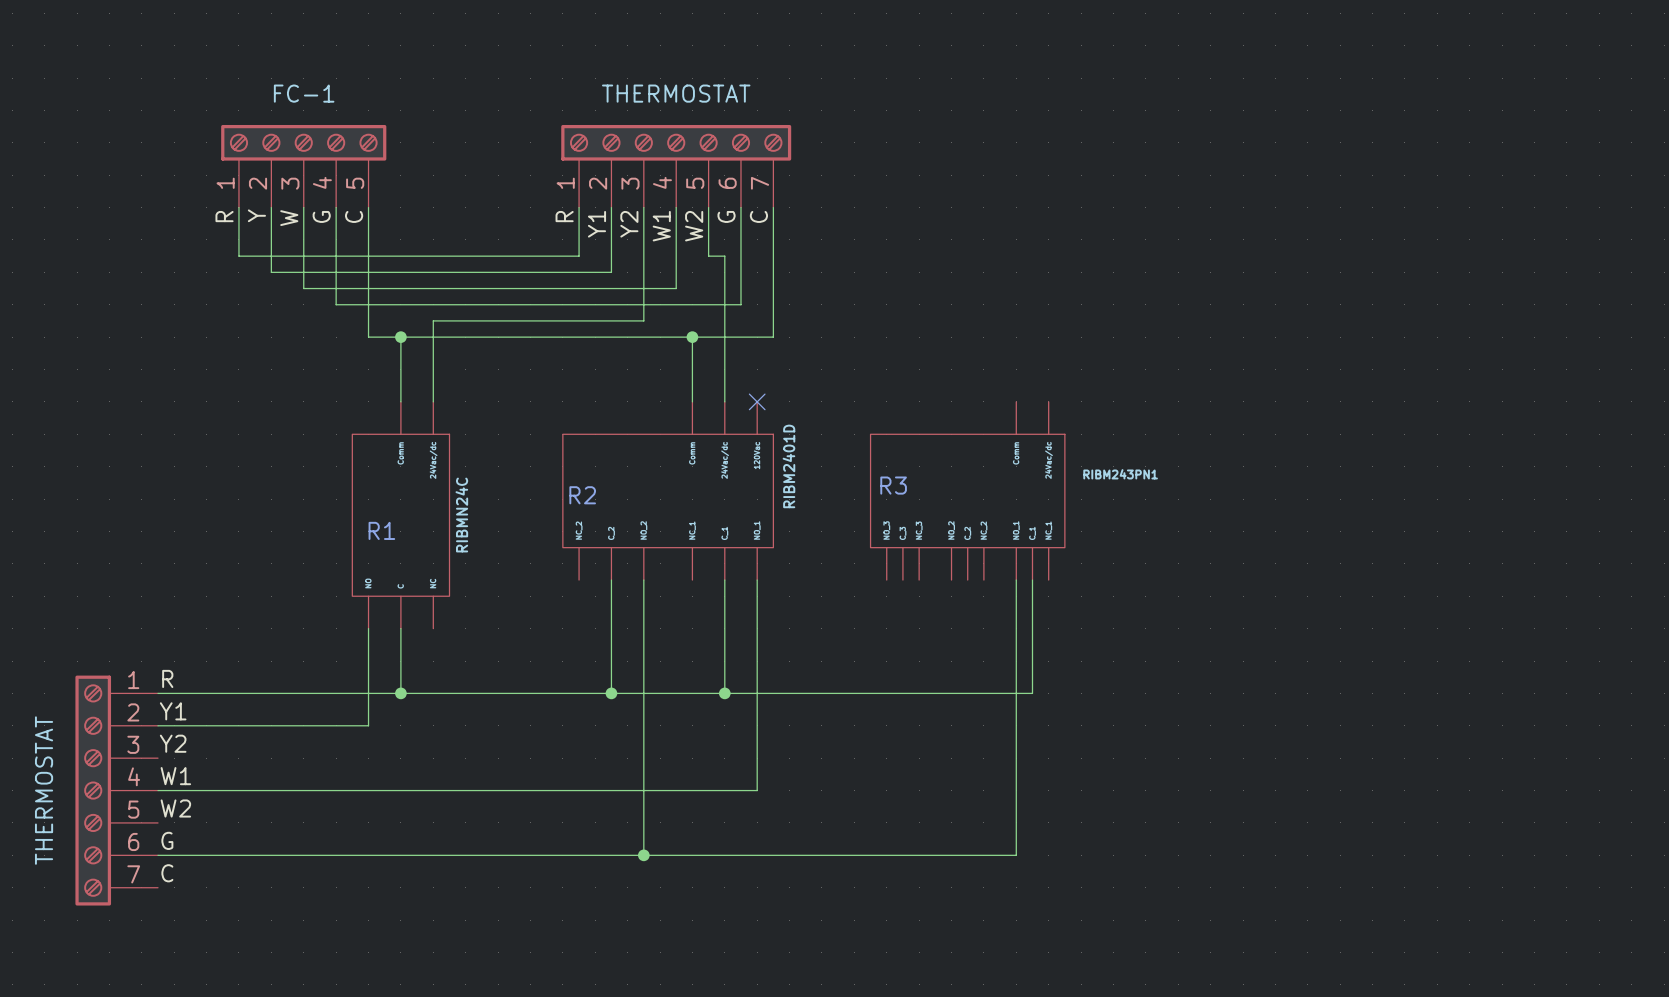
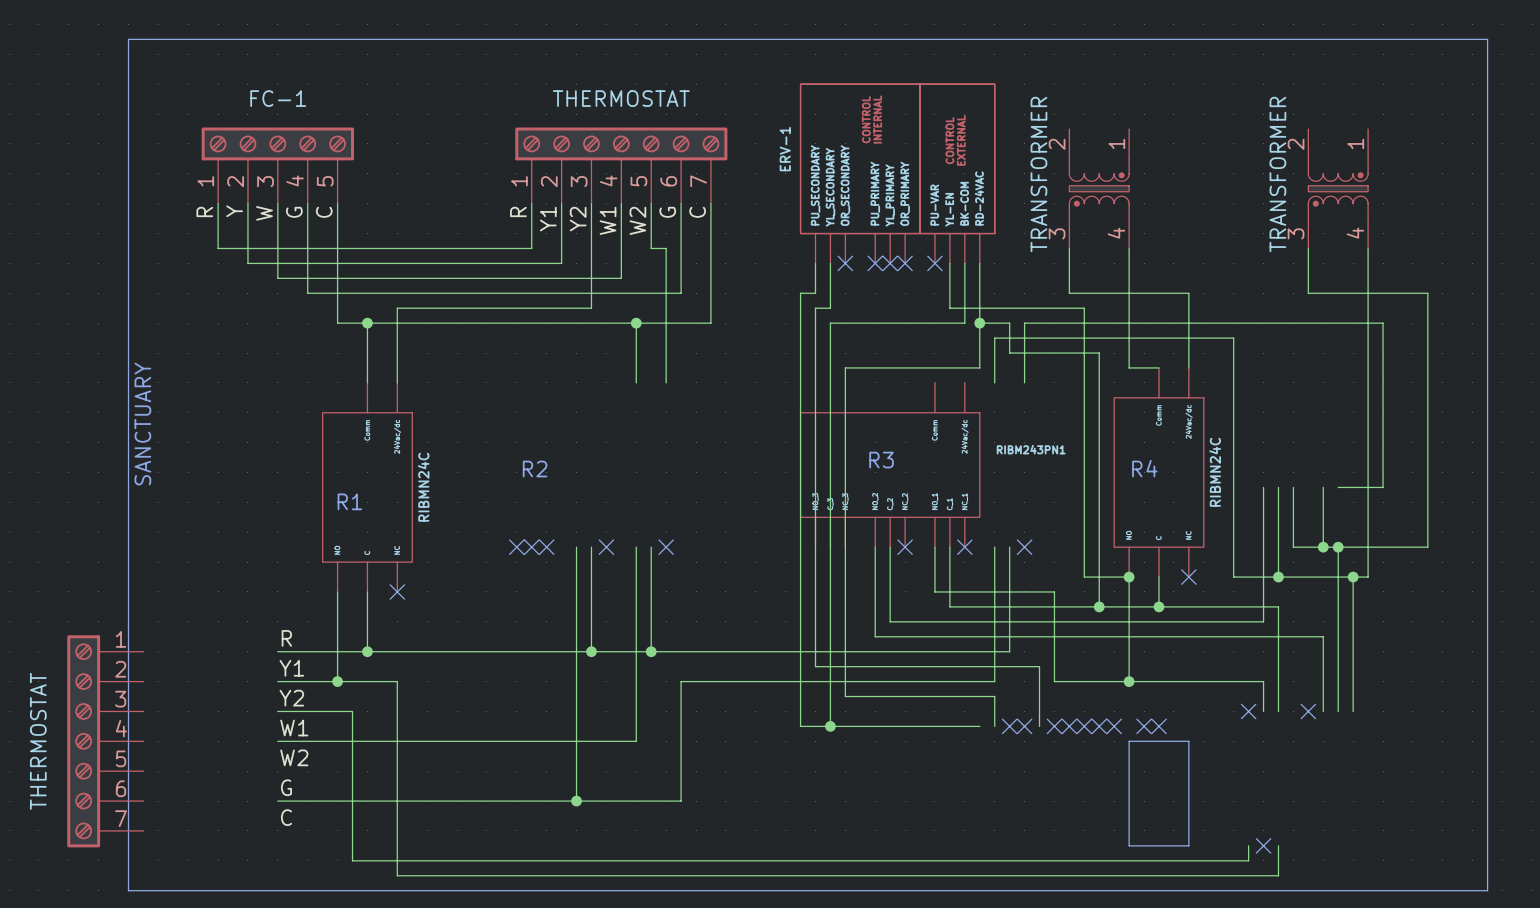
line: none -> (128, 39) (1487, 39) (1487, 890) (128, 890) (128, 39)
ERV-1: none -> (897, 173)
part: none -> TRANSFORMER (1099, 188)
part: none -> TRANSFORMER (1338, 188)
wire: none -> (1069, 248) (1069, 293) (1188, 293) (1188, 367)
wire: none -> (1129, 248) (1129, 367) (1159, 367)
wire: none -> (1308, 248) (1308, 293) (1427, 293) (1427, 547) (1293, 547) (1293, 487)
wire: none -> (1368, 248) (1368, 577) (1233, 577) (1233, 338) (994, 338) (994, 382)
wire: none -> (815, 263) (815, 293) (800, 293) (800, 726) (979, 726)
wire: none -> (830, 263) (830, 308) (815, 308) (815, 666) (1039, 666) (1039, 726)
no-connect mark: none -> (845, 263)
no-connect mark: none -> (875, 263)
no-connect mark: none -> (890, 263)
no-connect mark: none -> (905, 263)
no-connect mark: none -> (934, 263)
wire: none -> (949, 263) (949, 308) (1084, 308) (1084, 577) (1129, 577) (1129, 681)
wire: none -> (964, 263) (964, 323) (830, 323) (830, 726)
wire: none -> (979, 263) (979, 367) (845, 367) (845, 696) (994, 696) (994, 726)
wire: none -> (979, 323) (1009, 323) (1009, 353) (1099, 353) (1099, 606)
junction: none -> (979, 323)
no-connect mark: (757, 401) -> none
wire: none -> (1024, 382) (1024, 323) (1383, 323) (1383, 487) (1338, 487)
text: none -> SANCTUARY (142, 424)
text position: R3 (893, 485) -> R3 (881, 460)
RIBM2401D: (668, 490) -> none
text: none -> R4 (1144, 468)
RIBMN24C: none -> (1159, 472)
wire: none -> (1263, 487) (1263, 621) (890, 621) (890, 547)
wire: none -> (1278, 487) (1278, 577)
wire: none -> (1323, 487) (1323, 547)
no-connect mark: none -> (516, 547)
no-connect mark: none -> (531, 547)
no-connect mark: none -> (546, 547)
wire: (611, 580) (611, 693) -> none
wire: none -> (576, 547) (576, 801)
no-connect mark: none -> (606, 547)
wire: (724, 580) (724, 693) -> (651, 547) (651, 651)
no-connect mark: none -> (666, 547)
wire: (757, 580) (757, 790) (692, 790) -> (636, 547) (636, 741)
wire: none -> (875, 547) (875, 636) (1323, 636) (1323, 711)
no-connect mark: none -> (905, 547)
no-connect mark: none -> (964, 547)
no-connect mark: none -> (1024, 547)
junction: none -> (1323, 547)
wire: none -> (1338, 547) (1338, 711)
junction: none -> (1338, 547)
junction: none -> (1129, 577)
wire: none -> (1159, 577) (1159, 606)
no-connect mark: none -> (1188, 577)
junction: none -> (1278, 577)
wire: none -> (1353, 577) (1353, 711)
junction: none -> (1353, 577)
no-connect mark: none -> (397, 591)
wire: (1016, 628) (1016, 855) (740, 855) -> (994, 547) (994, 681) (681, 681) (681, 801)
wire: none -> (934, 591) (1054, 591) (1054, 681) (1263, 681) (1263, 711)
wire: (1032, 644) (1032, 693) -> (1009, 547) (1009, 651) (949, 651)
wire: none -> (949, 606) (1278, 606) (1278, 711)
junction: none -> (1099, 606)
junction: none -> (1159, 606)
label position: R (167, 678) -> R (286, 638)
wire: (158, 693) (303, 693) -> none
junction position: (611, 693) -> (591, 651)
wire: (643, 693) (643, 855) -> none
junction position: (724, 693) -> (651, 651)
label position: Y1 (173, 711) -> Y1 (291, 668)
wire: (158, 725) (303, 725) -> none
wire: none -> (337, 681) (397, 681) (397, 875) (1278, 875) (1278, 845)
junction: none -> (337, 681)
junction: none -> (1129, 681)
label position: Y2 (173, 743) -> Y2 (291, 698)
wire: none -> (277, 711) (352, 711) (352, 860) (1248, 860) (1248, 845)
no-connect mark: none -> (1248, 711)
no-connect mark: none -> (1308, 711)
junction: none -> (830, 726)
no-connect mark: none -> (1009, 726)
no-connect mark: none -> (1024, 726)
no-connect mark: none -> (1054, 726)
no-connect mark: none -> (1069, 726)
no-connect mark: none -> (1084, 726)
no-connect mark: none -> (1099, 726)
no-connect mark: none -> (1114, 726)
no-connect mark: none -> (1144, 726)
no-connect mark: none -> (1159, 726)
label position: W1 (175, 776) -> W1 (294, 728)
wire: (158, 790) (303, 790) -> none
line: none -> (1129, 741) (1188, 741) (1188, 845) (1129, 845) (1129, 741)
label position: W2 (175, 808) -> W2 (294, 757)
label position: G (167, 840) -> G (286, 787)
wire: (158, 855) (303, 855) -> none
junction position: (643, 855) -> (576, 801)
label position: C (167, 873) -> C (286, 817)
no-connect mark: none -> (1263, 845)

